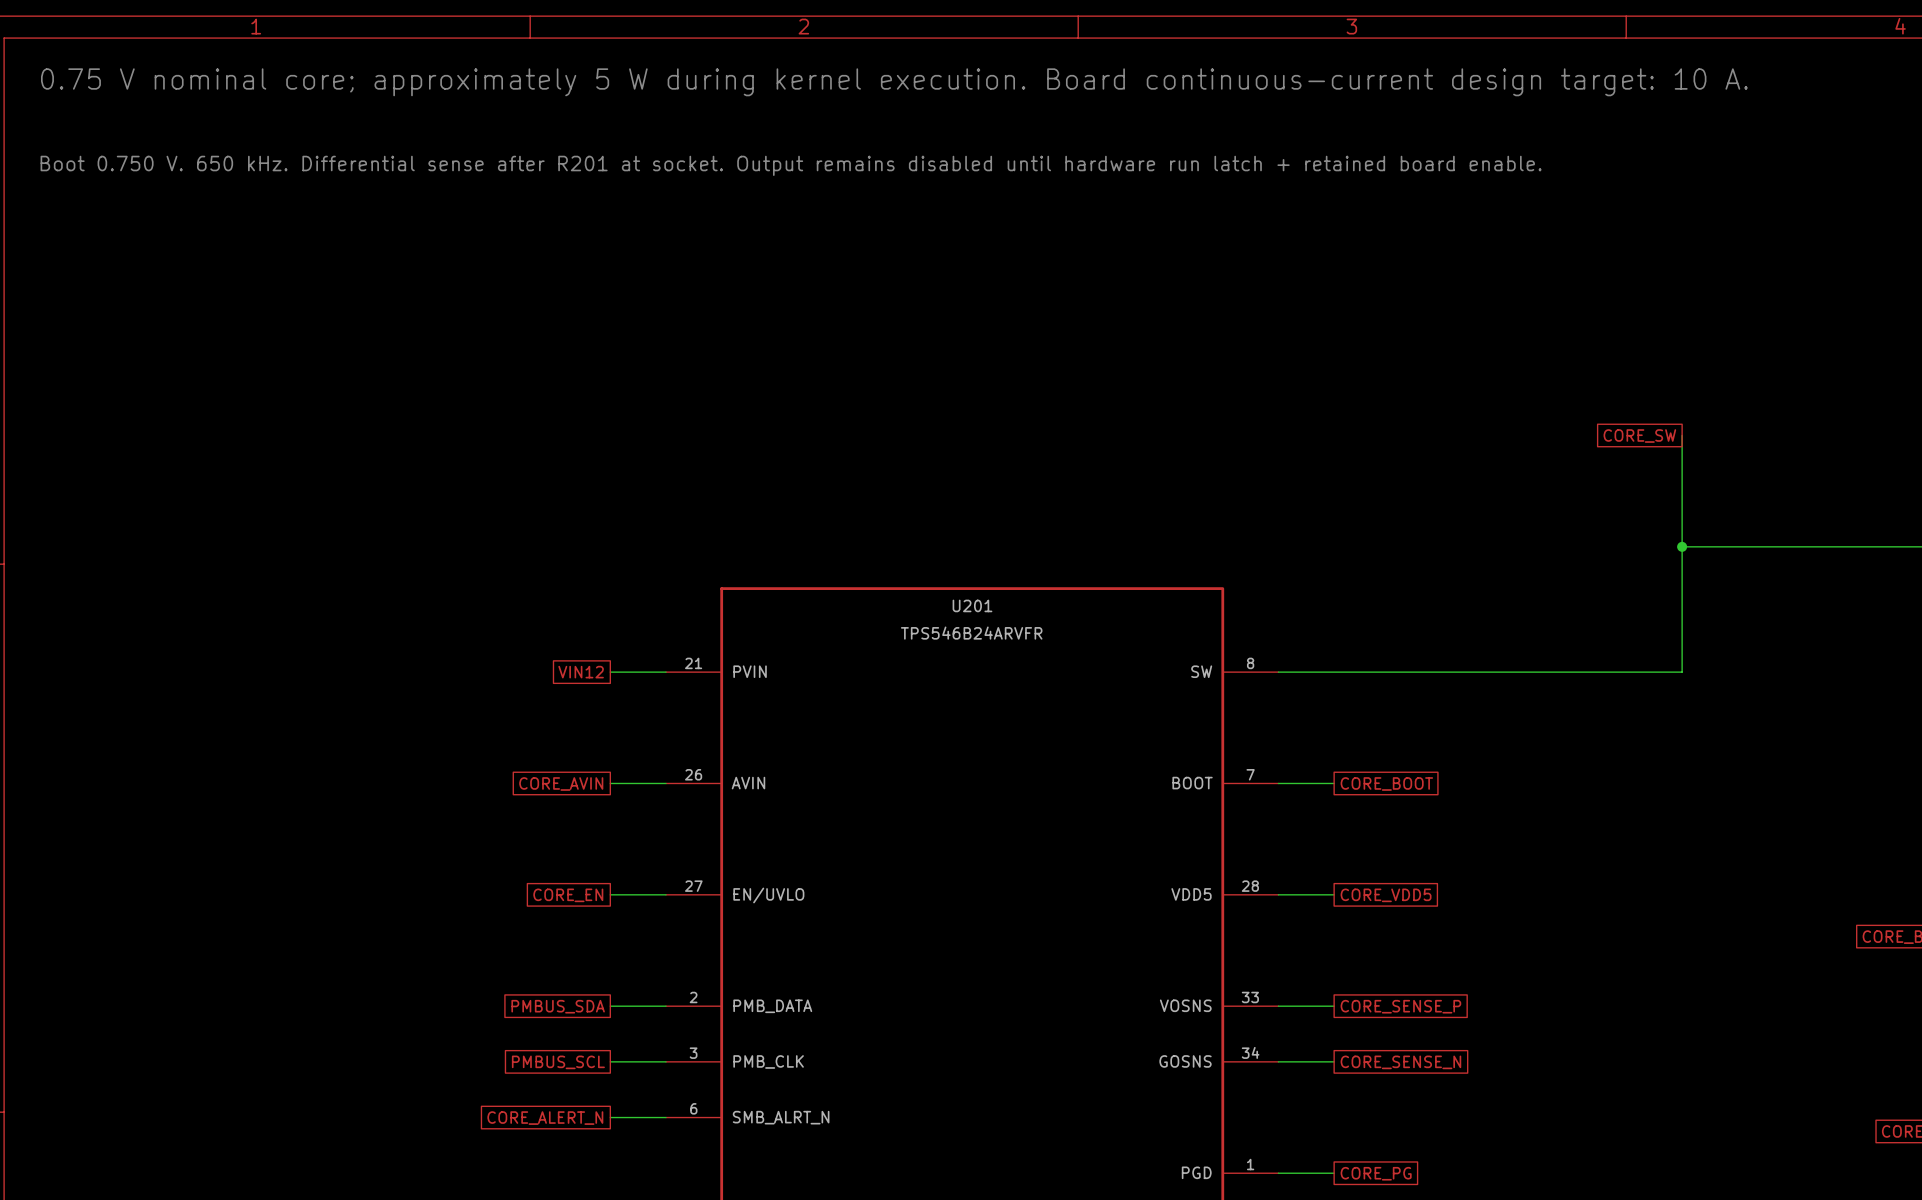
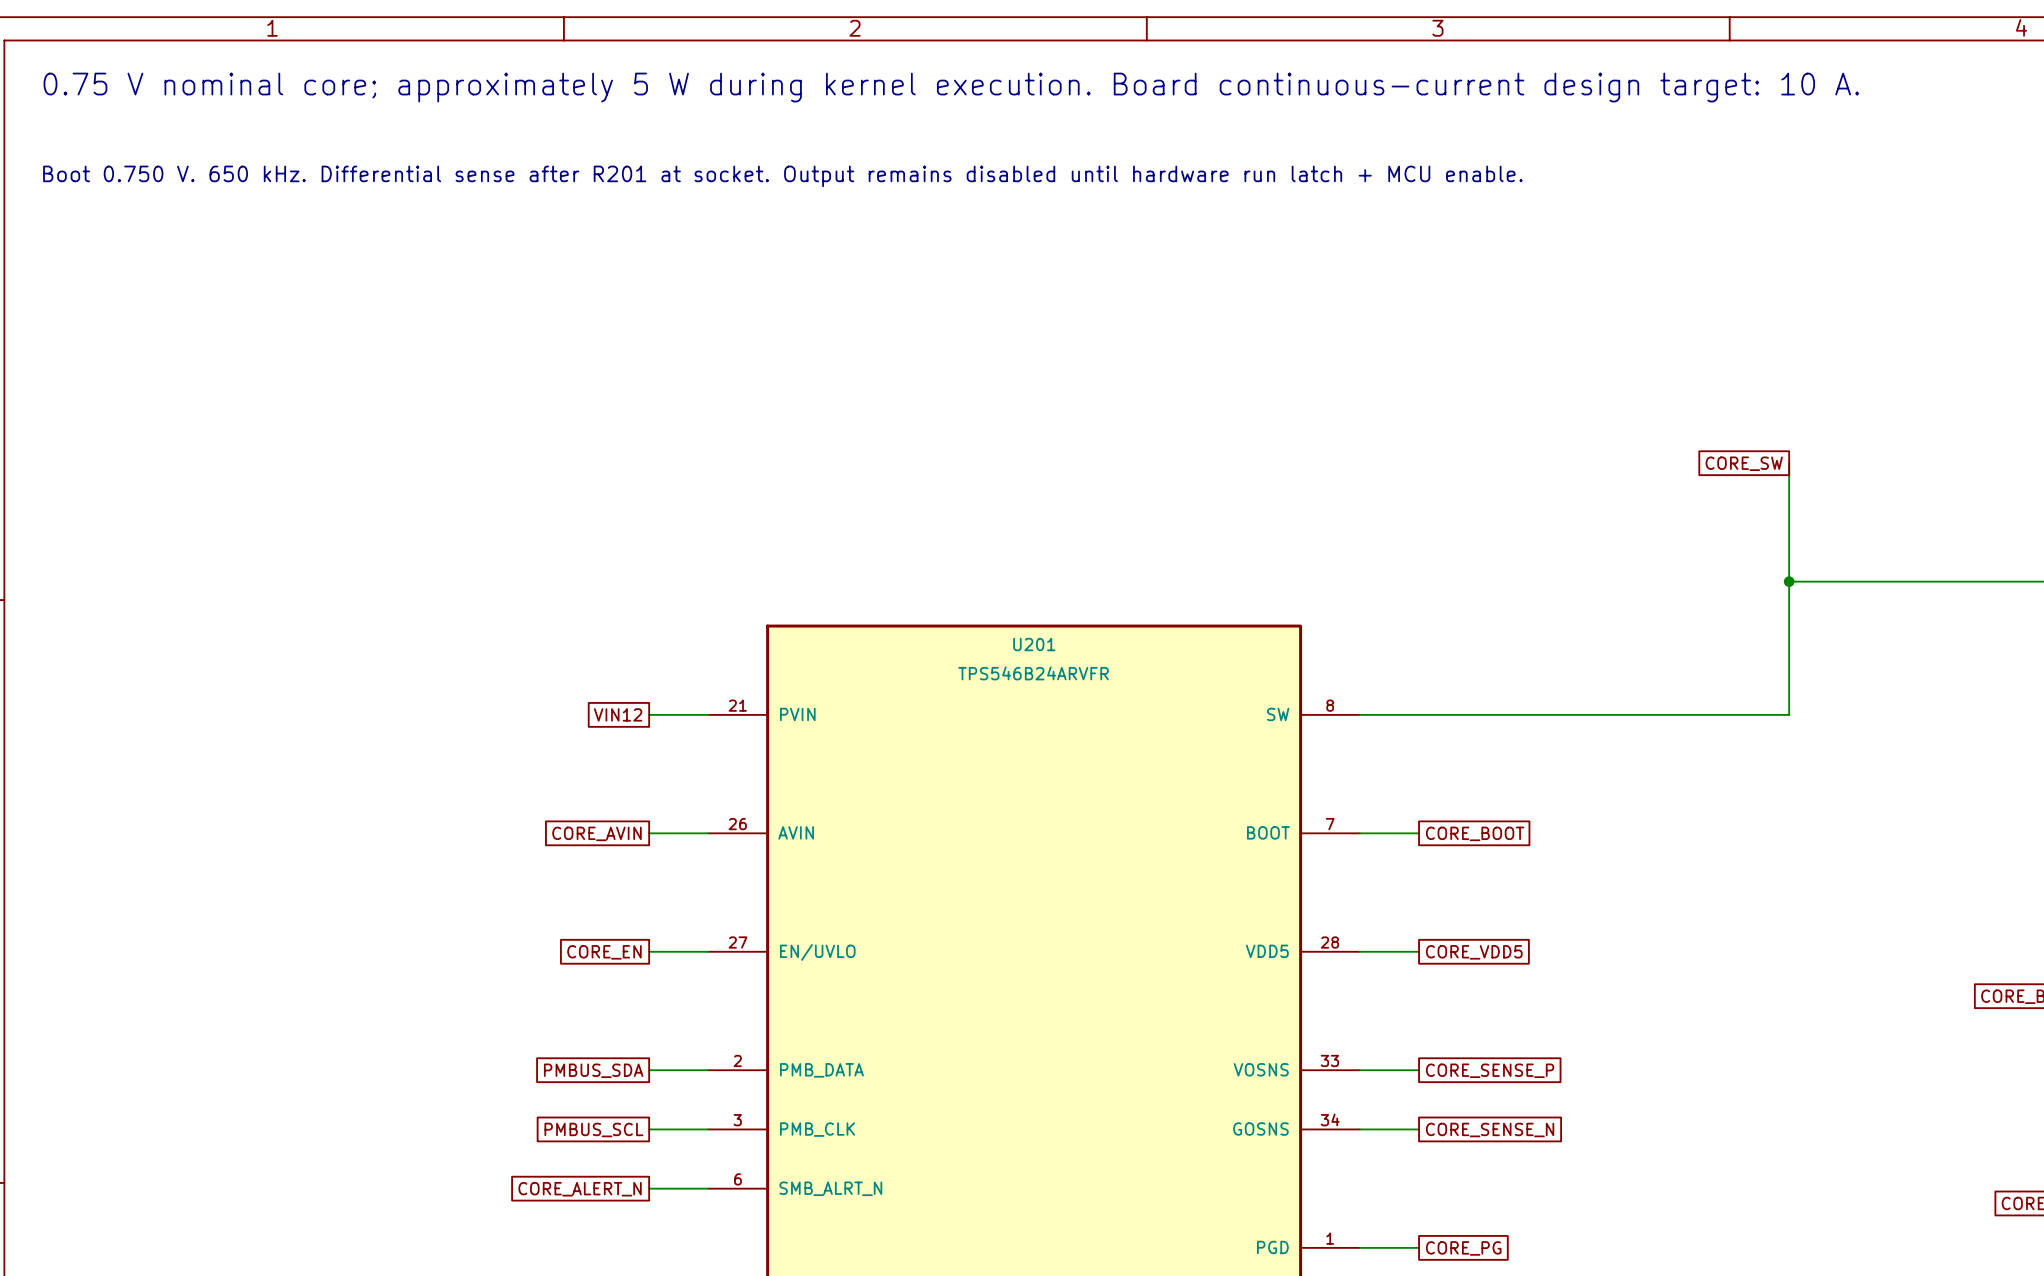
text: Boot 0.750 V. 650 kHz. Differential sense after R201 at socket. Output remains disabled until hardware run latch + retained board enable. (791, 165) -> Boot 0.750 V. 650 kHz. Differential sense after R201 at socket. Output remains disabled until hardware run latch + MCU enable. (782, 176)

